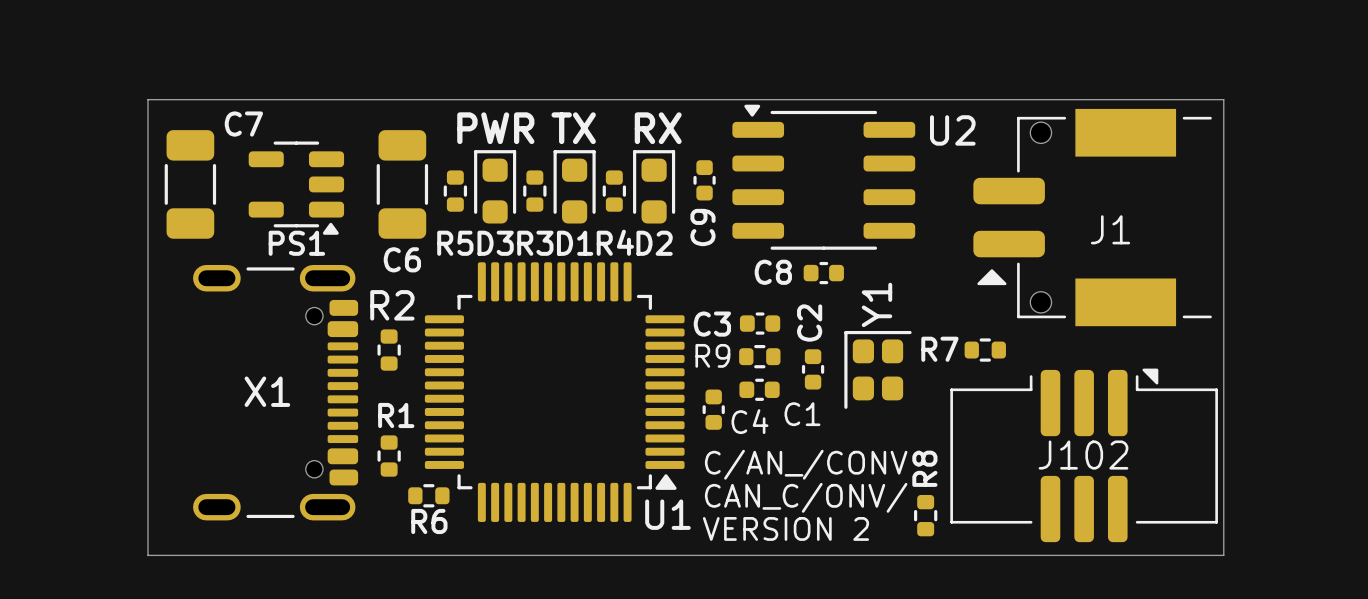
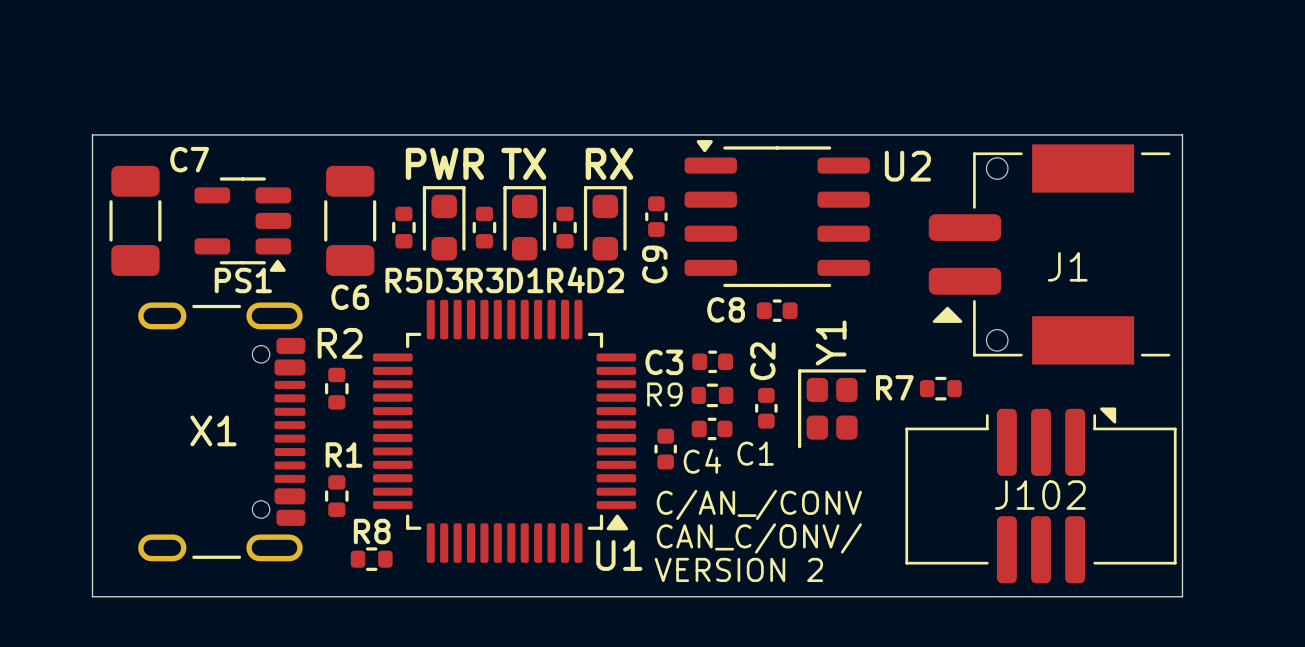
R6: (428, 495) -> none
R8 rotation: 0° (925, 515) -> 90° clockwise (371, 559)
R8 position: (925, 515) -> (371, 559)

